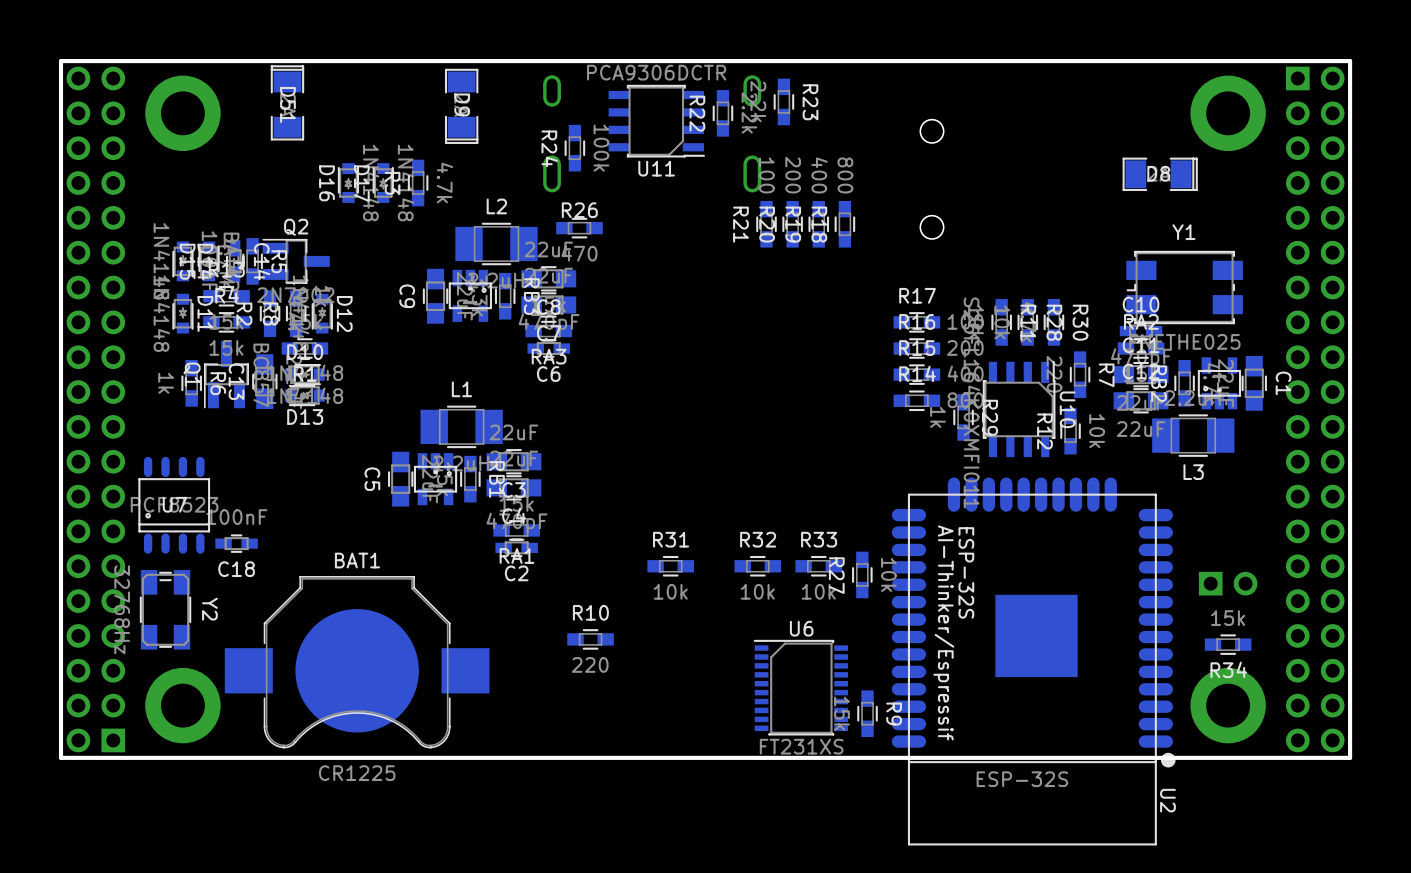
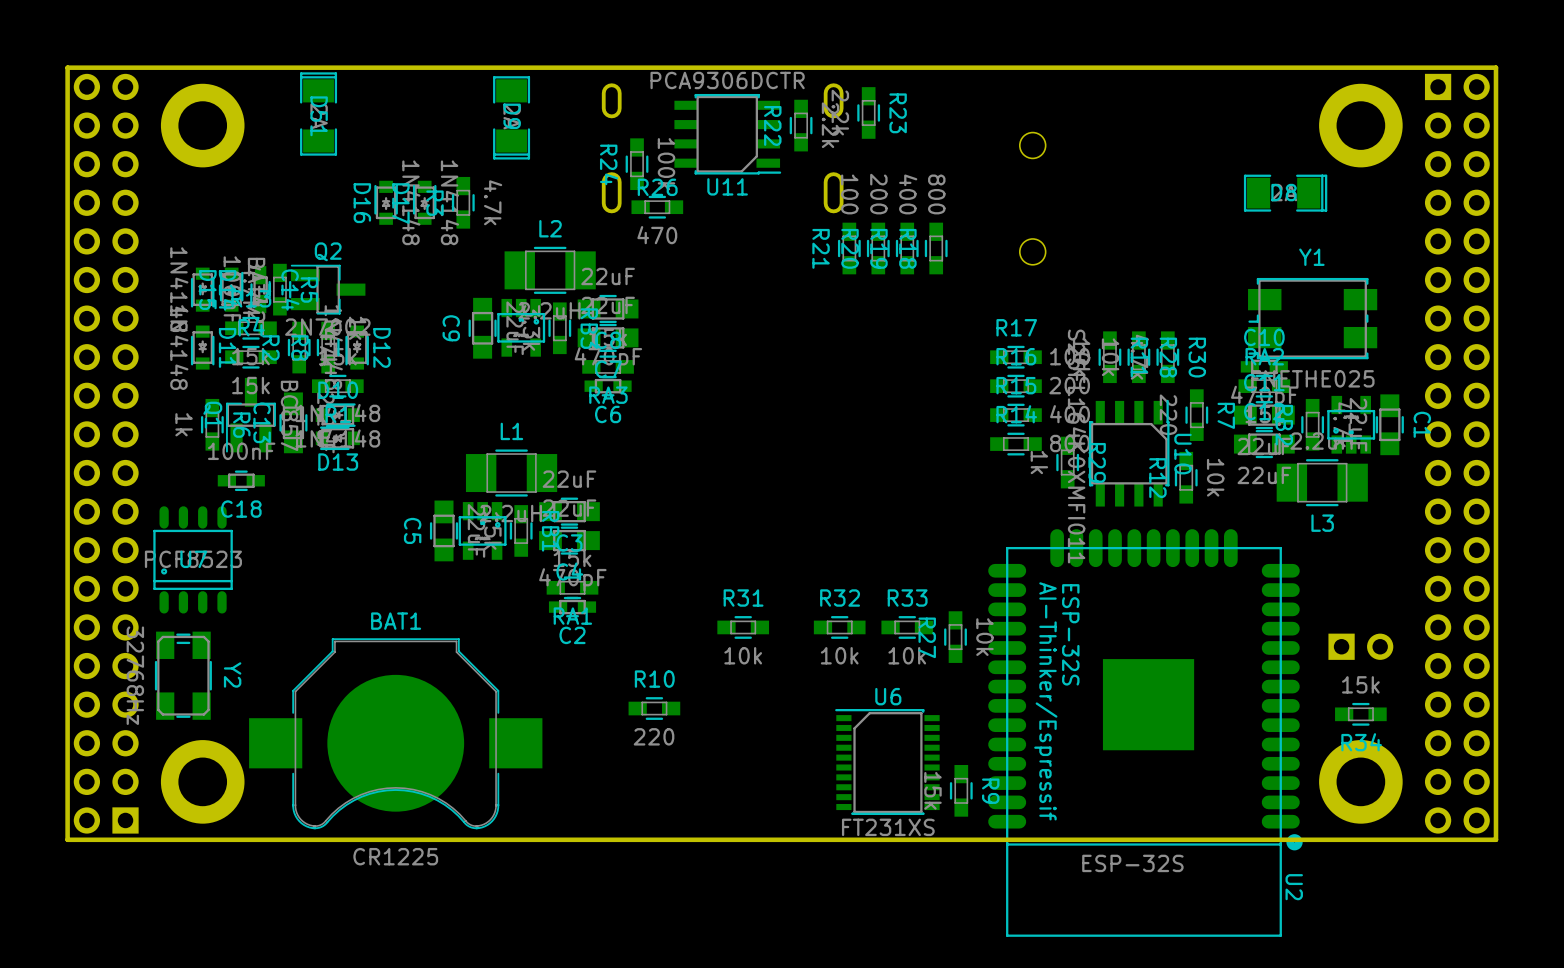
R26 position: (579, 228) -> (657, 207)
C18 position: (236, 543) -> (241, 480)

